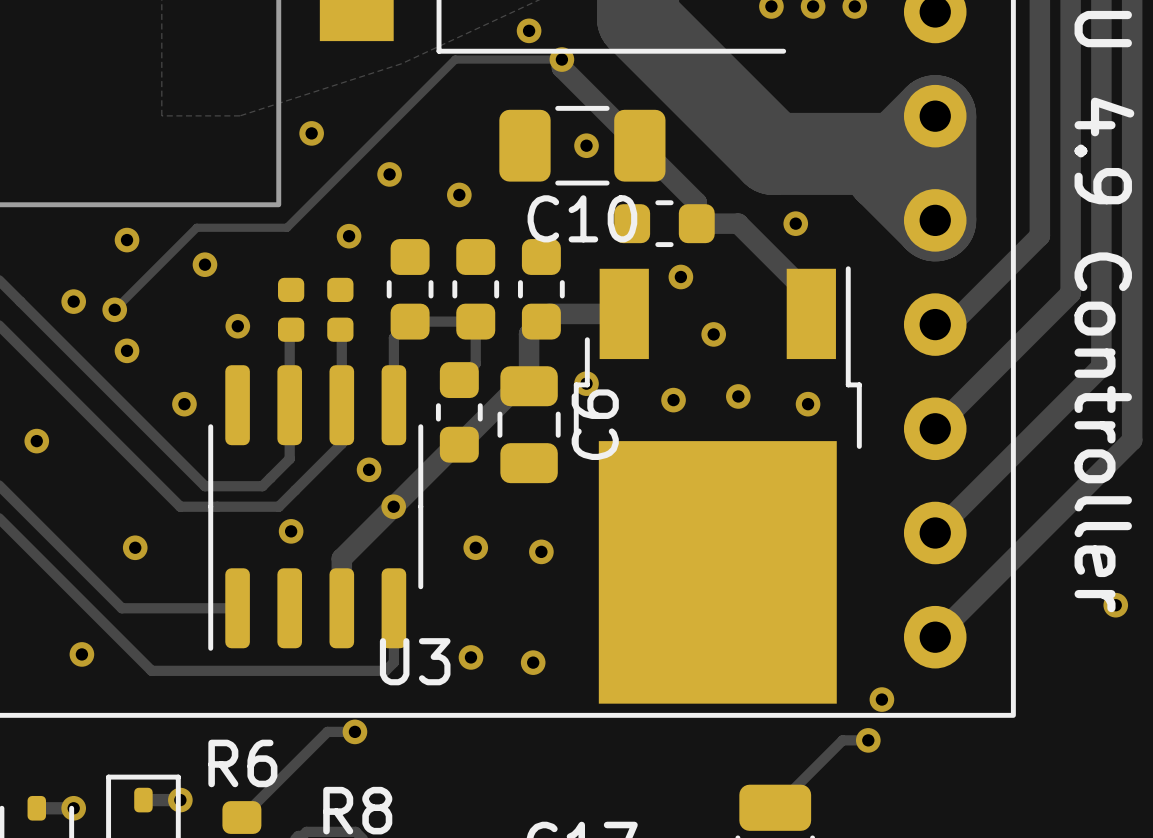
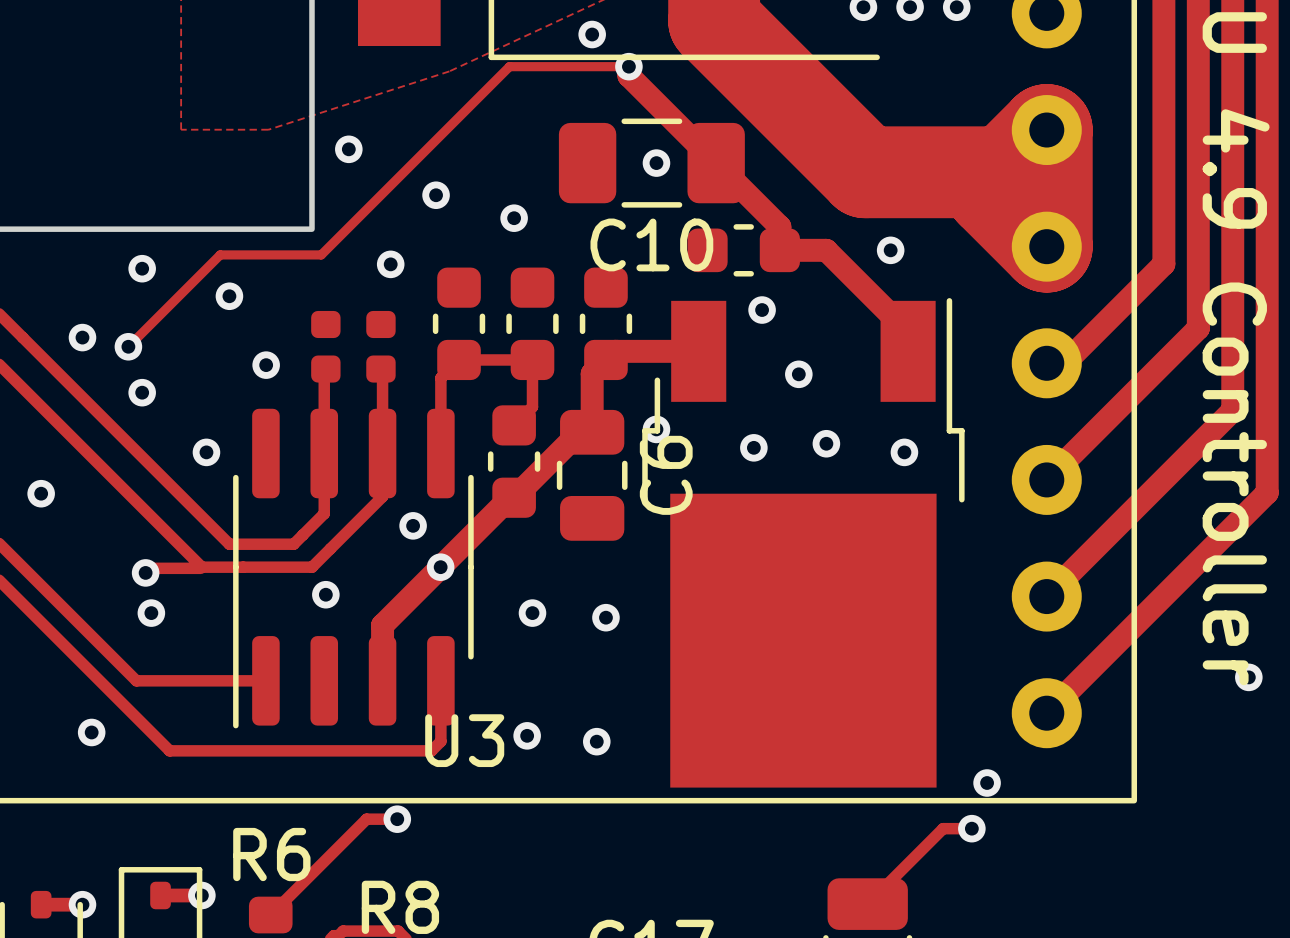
track: none -> (200, 568) (150, 568) (145, 572)
via: none -> (145, 572)

